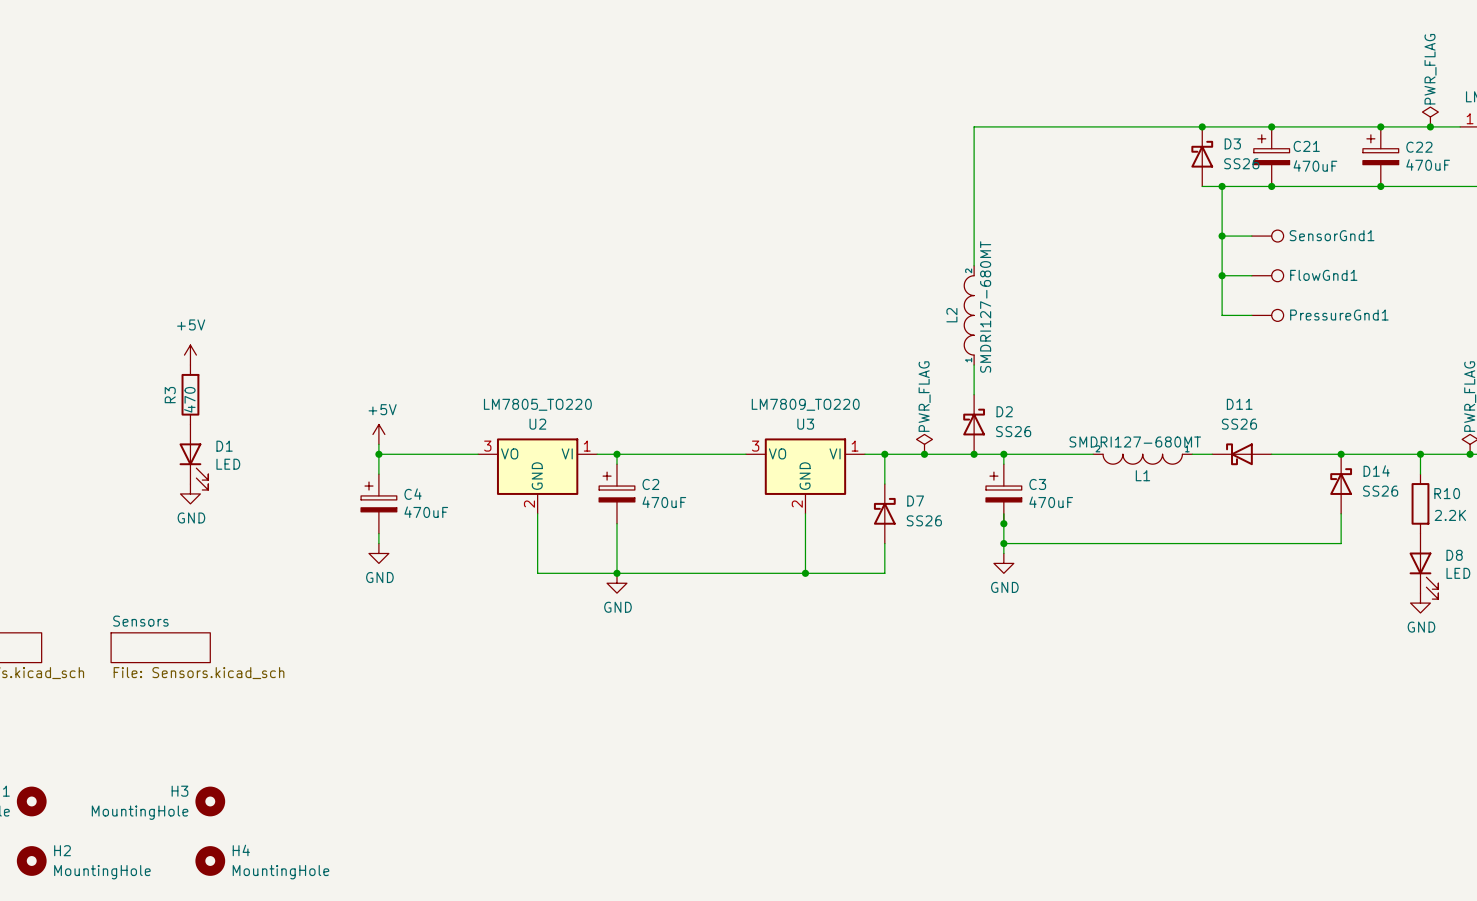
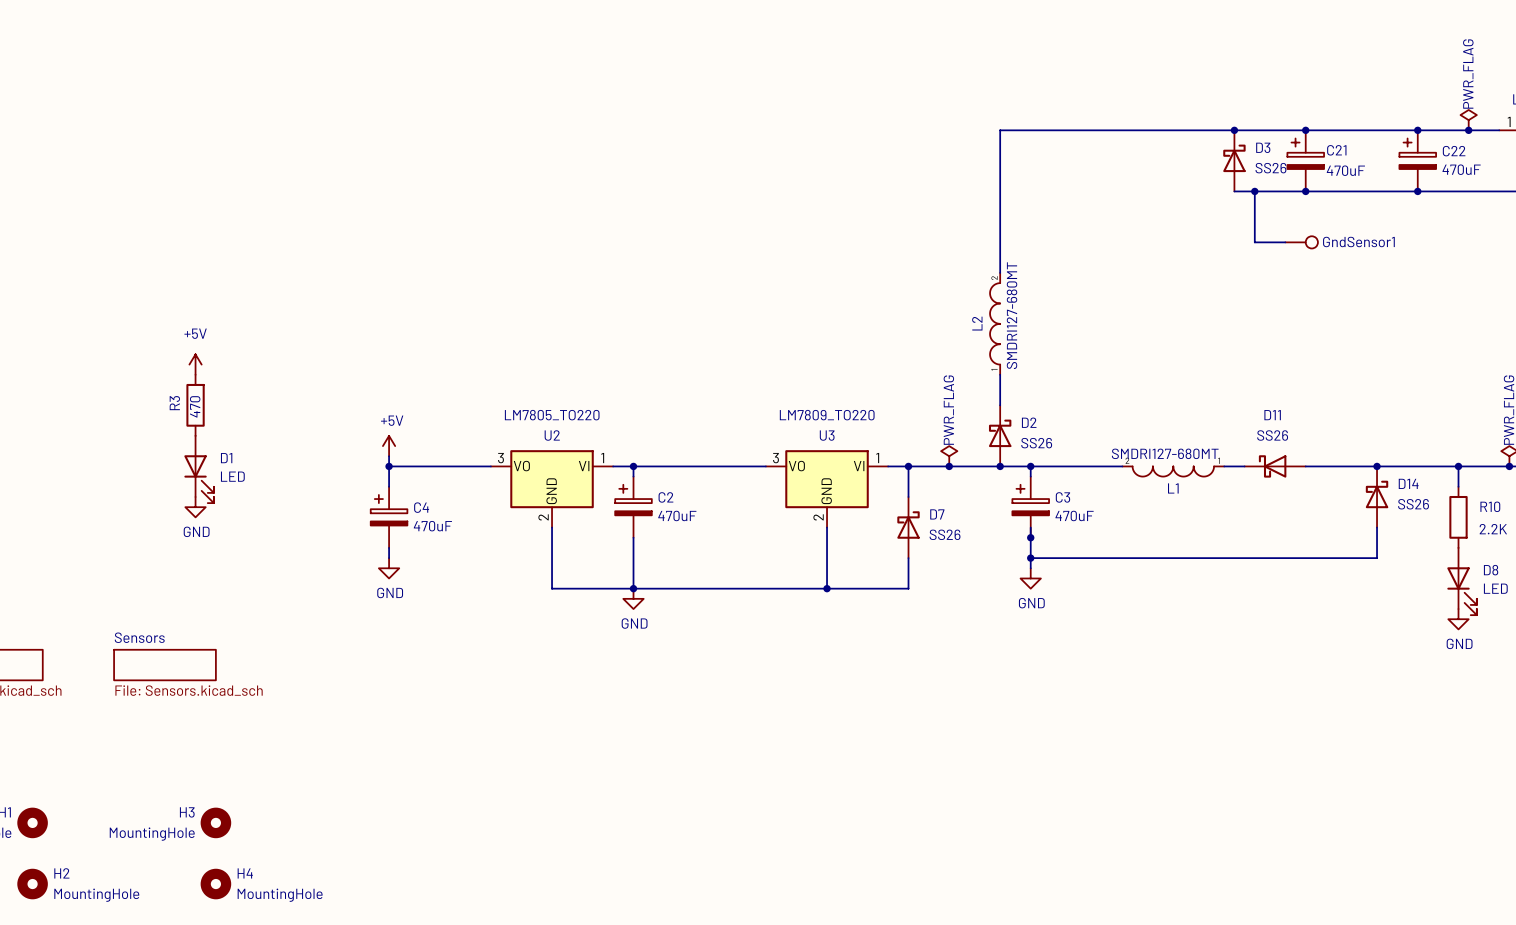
SensorGnd1 name: SensorGnd1 (1332, 235) -> GndSensor1 (1358, 241)
wire: (1222, 236) (1222, 315) (1251, 315) -> none
junction: (1222, 236) -> none
wire: (1222, 275) (1251, 275) -> none
junction: (1222, 275) -> none
FlowGnd1: (1267, 275) -> none
PressureGnd1: (1267, 315) -> none

